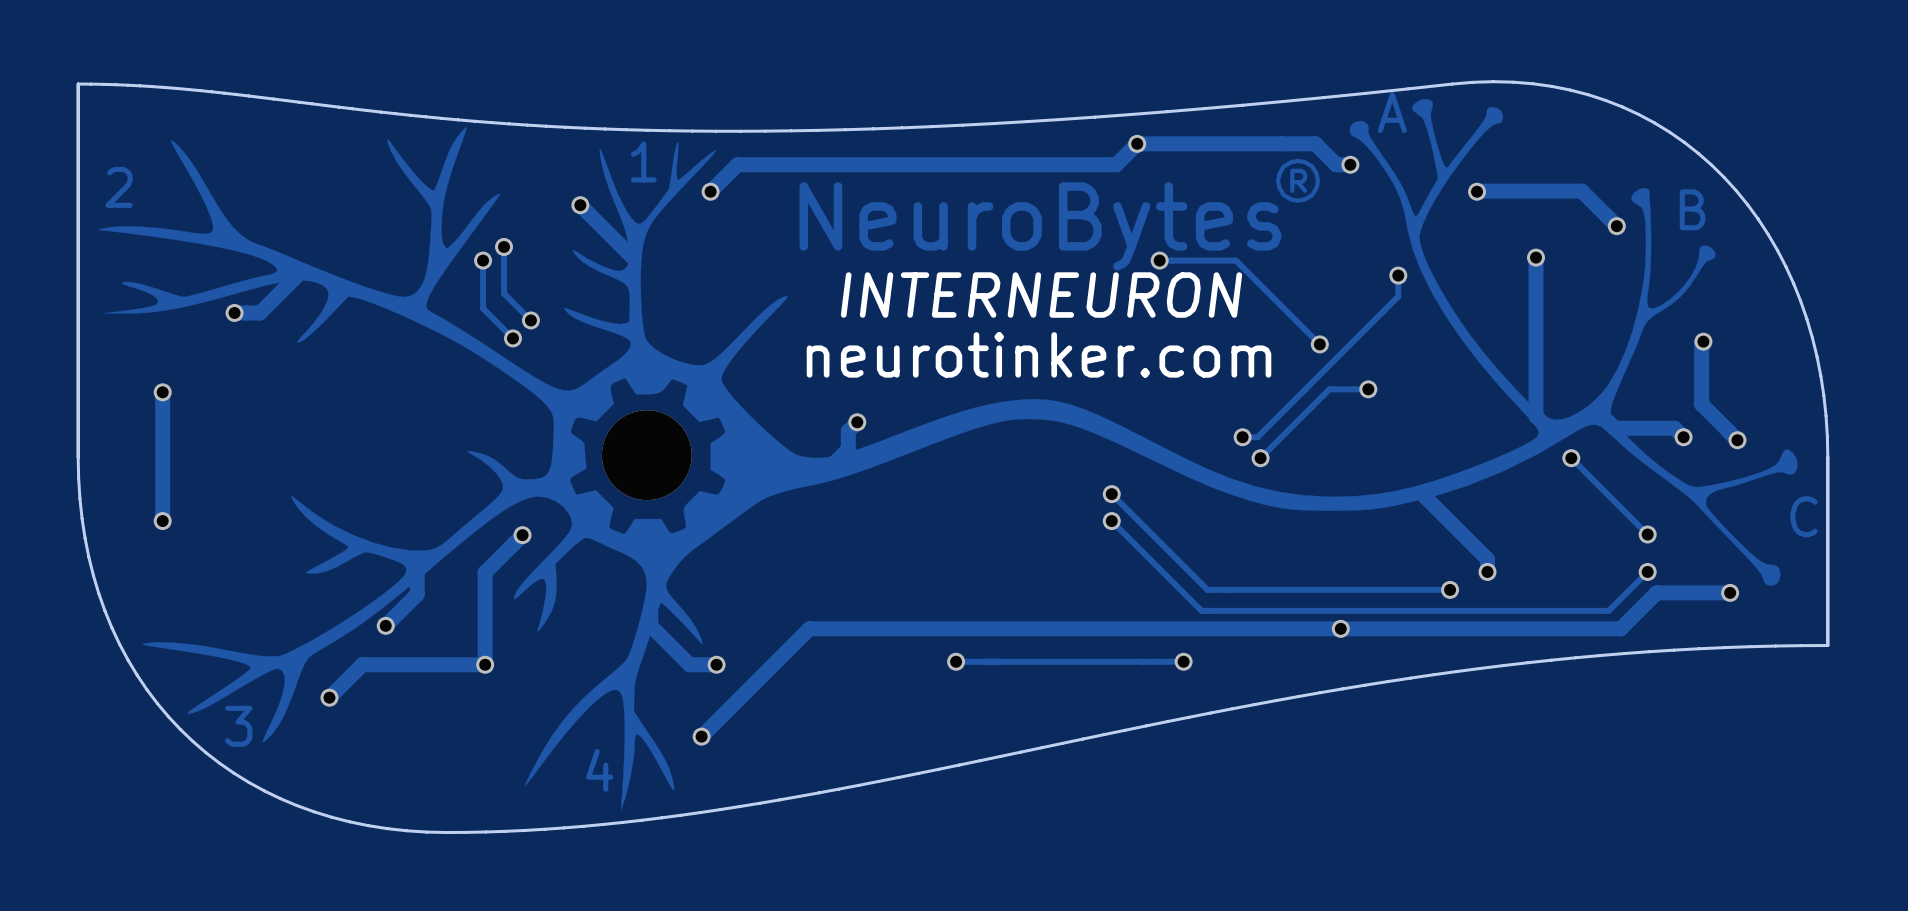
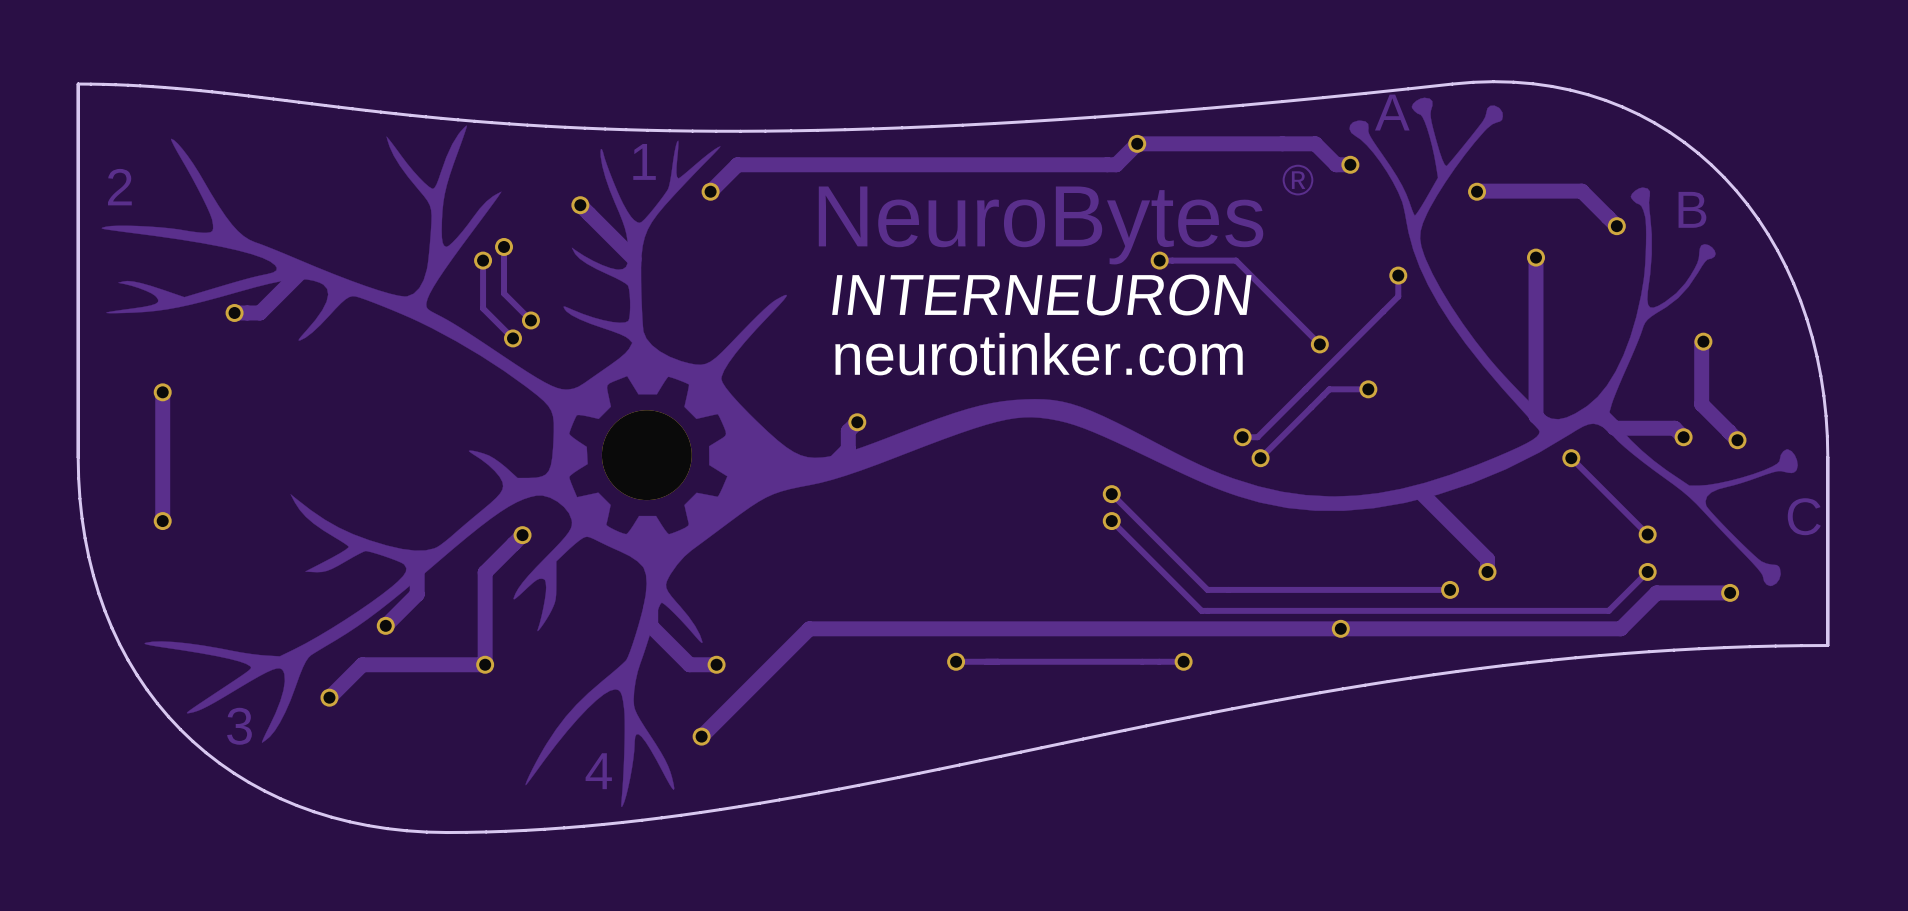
drawing shape: [98, 99, 1798, 811] -> [101, 97, 1798, 808]

